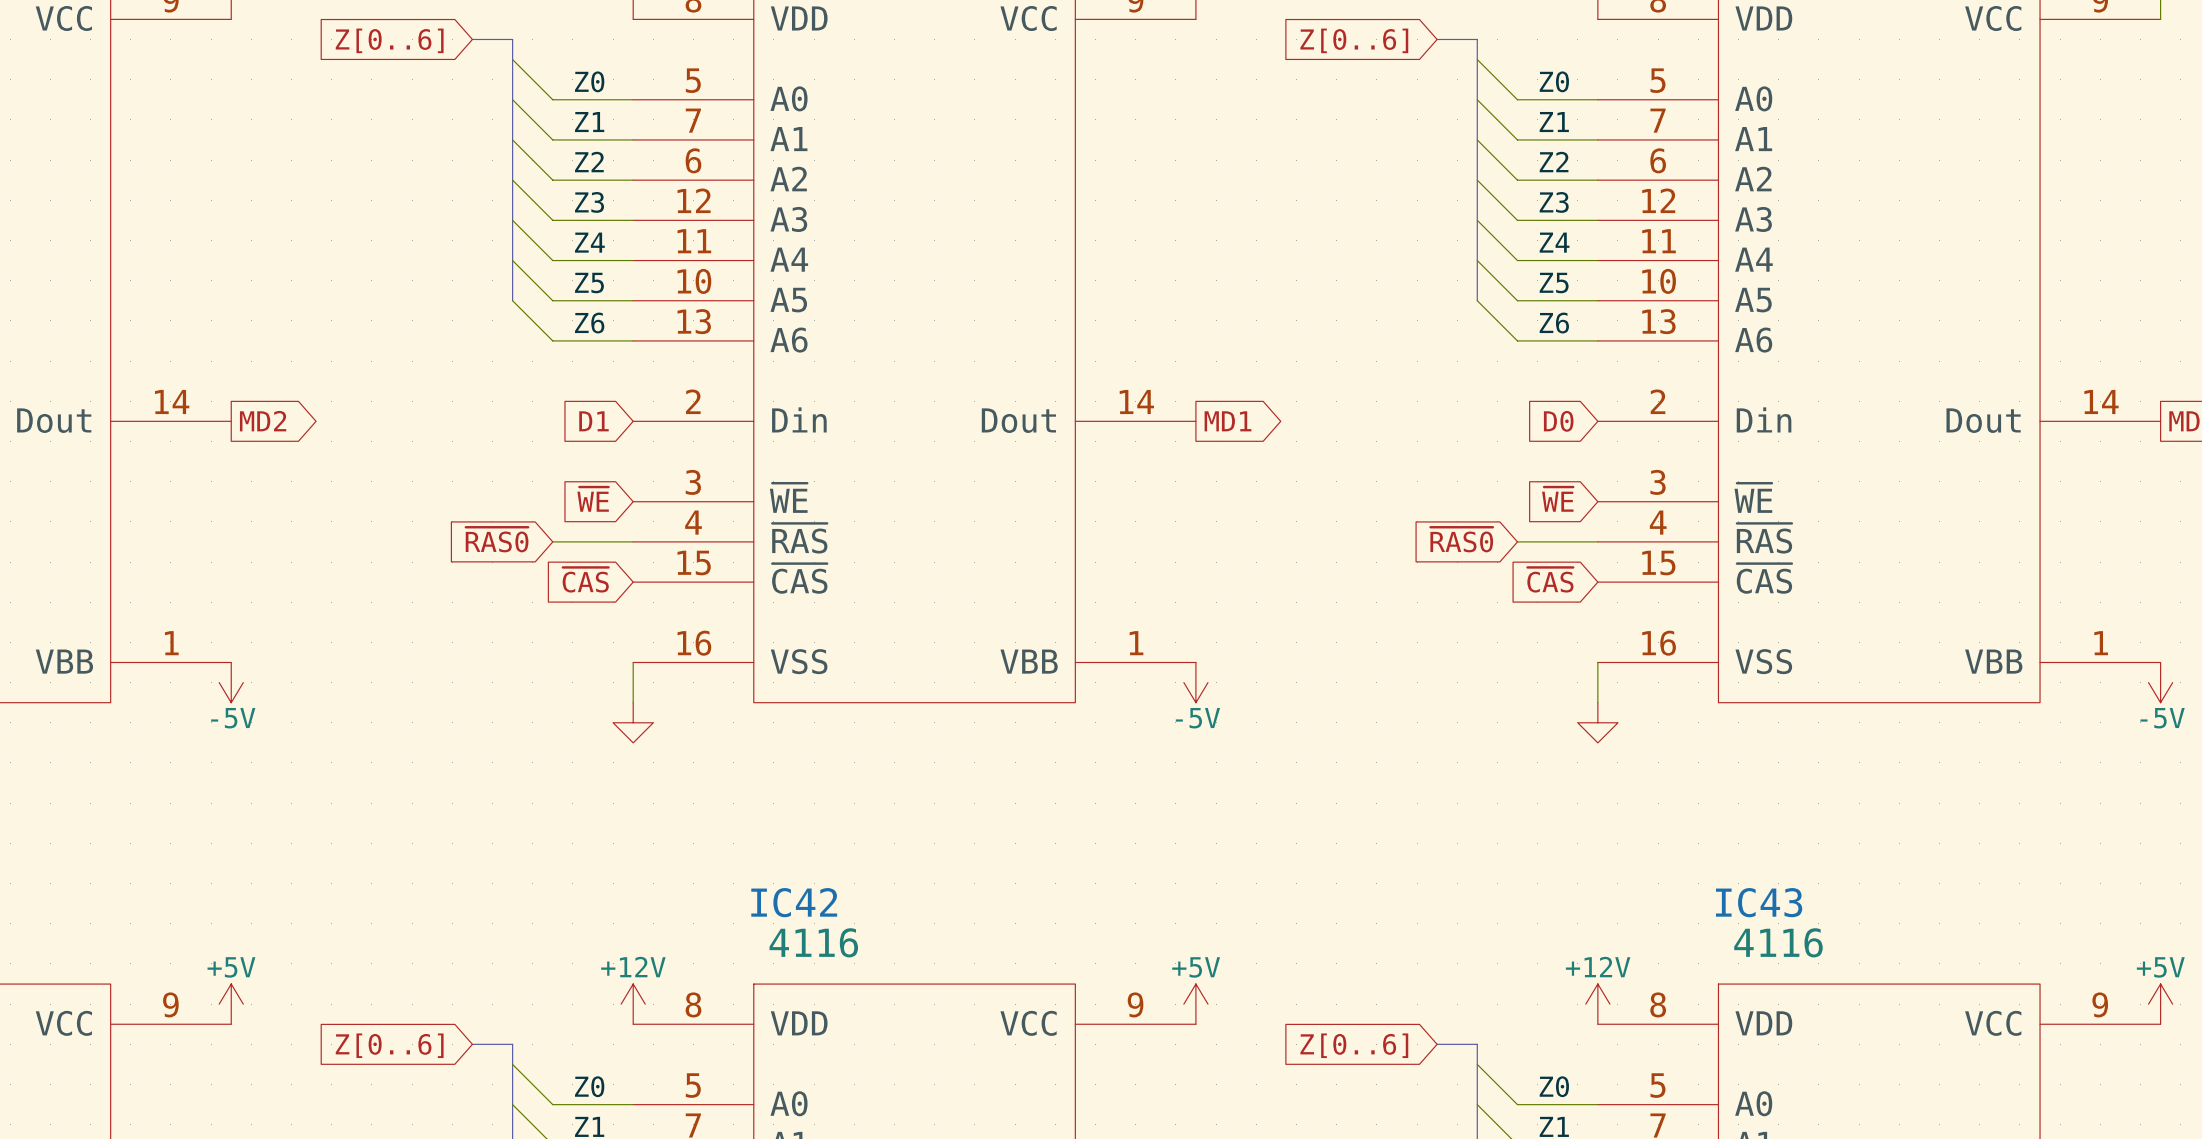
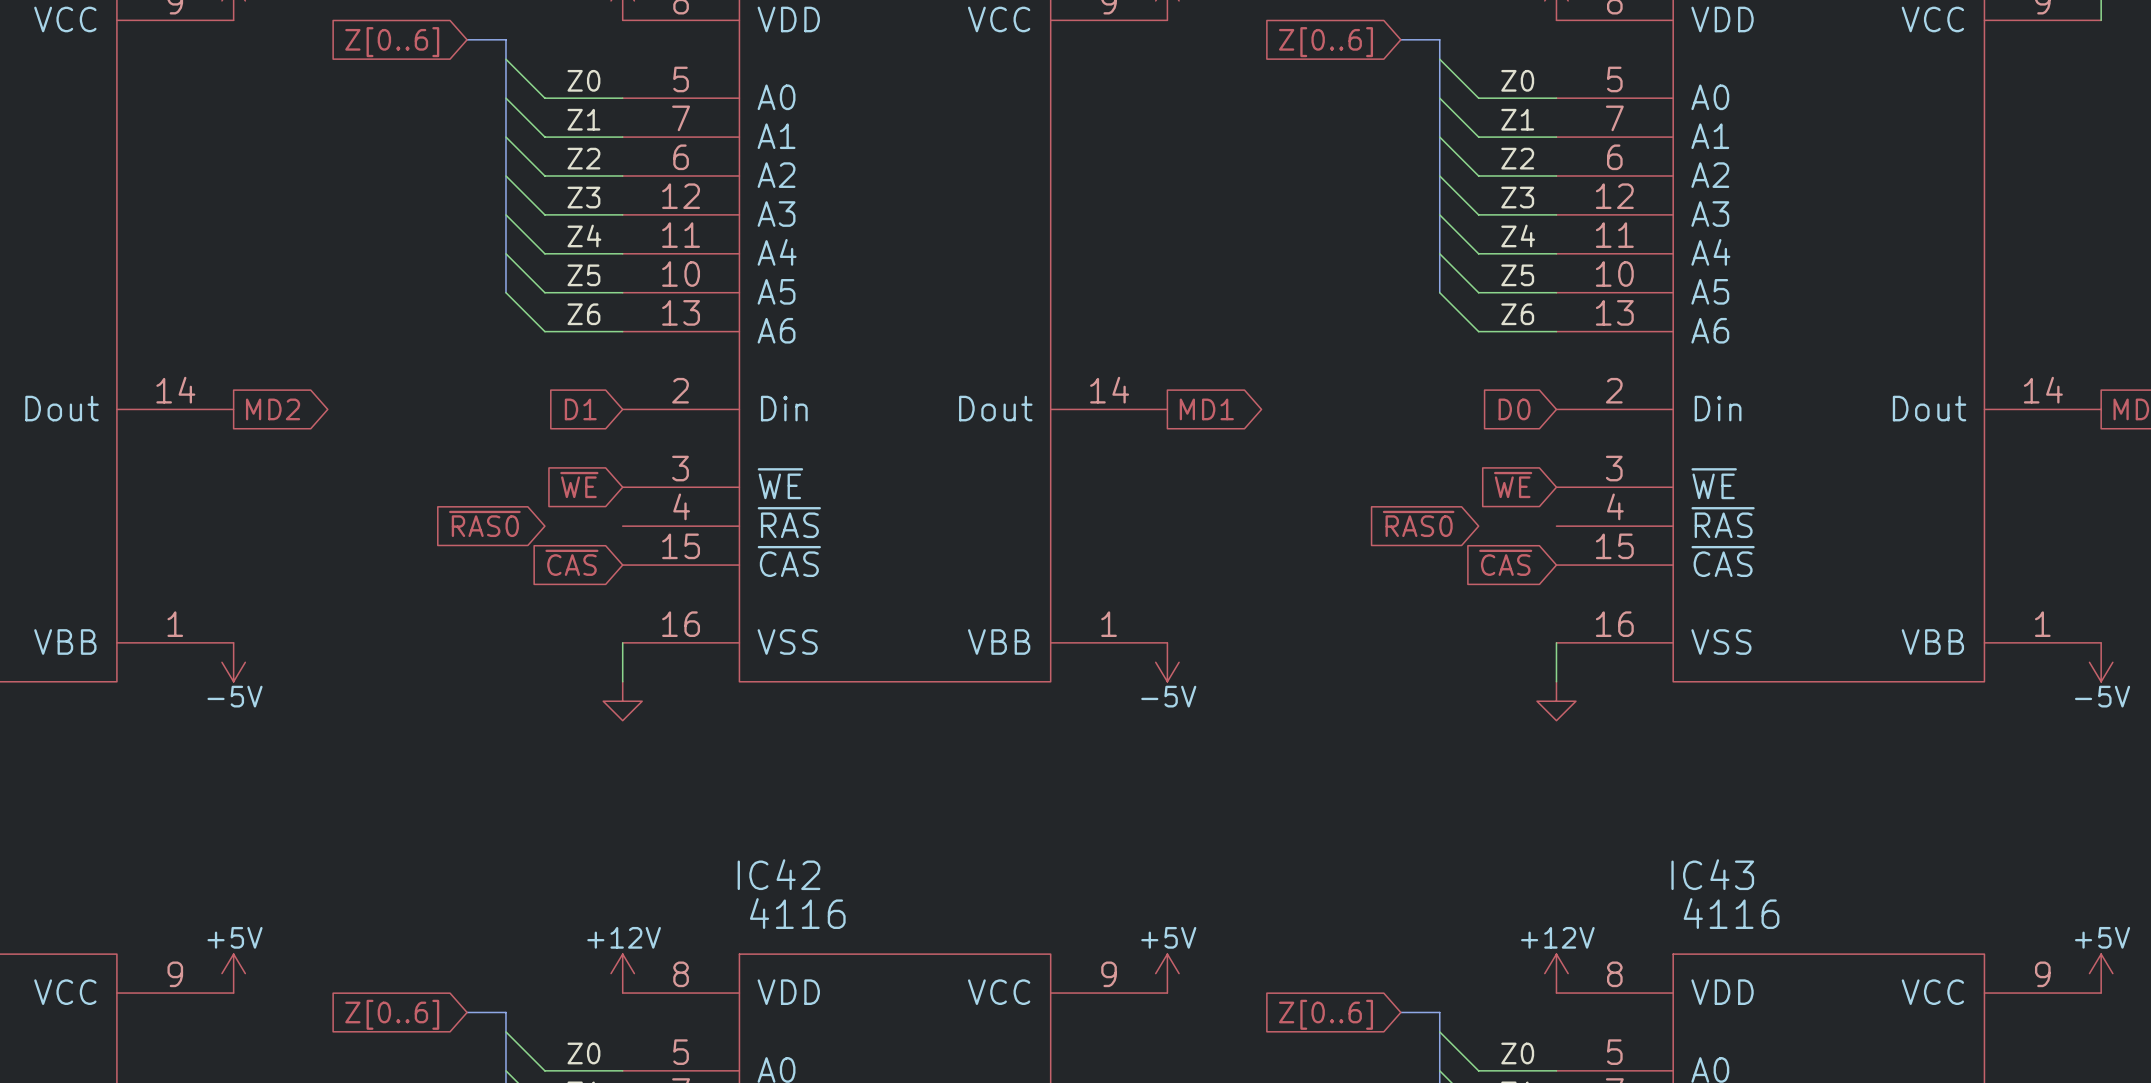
wire: (552, 541) (633, 541) -> none
wire: (1517, 541) (1597, 541) -> none

